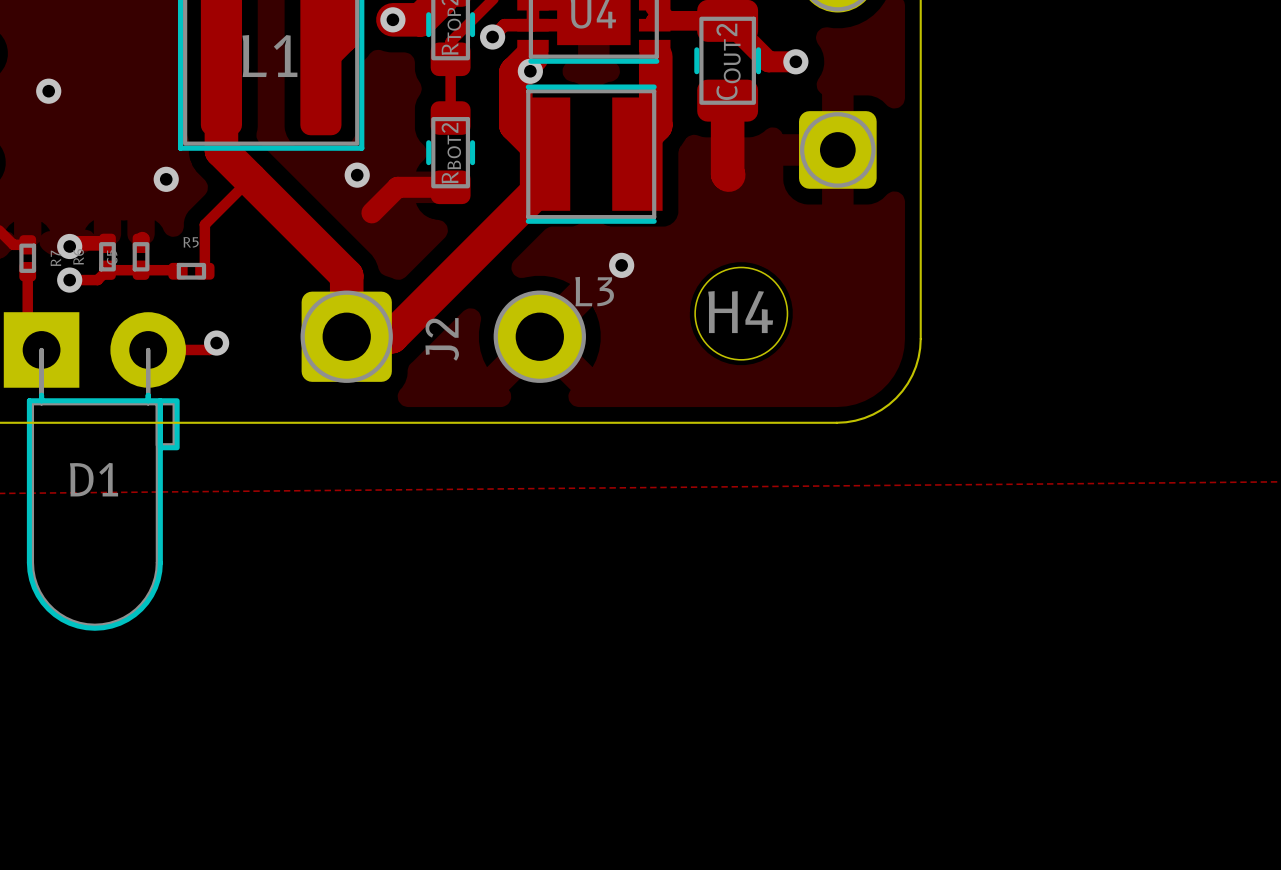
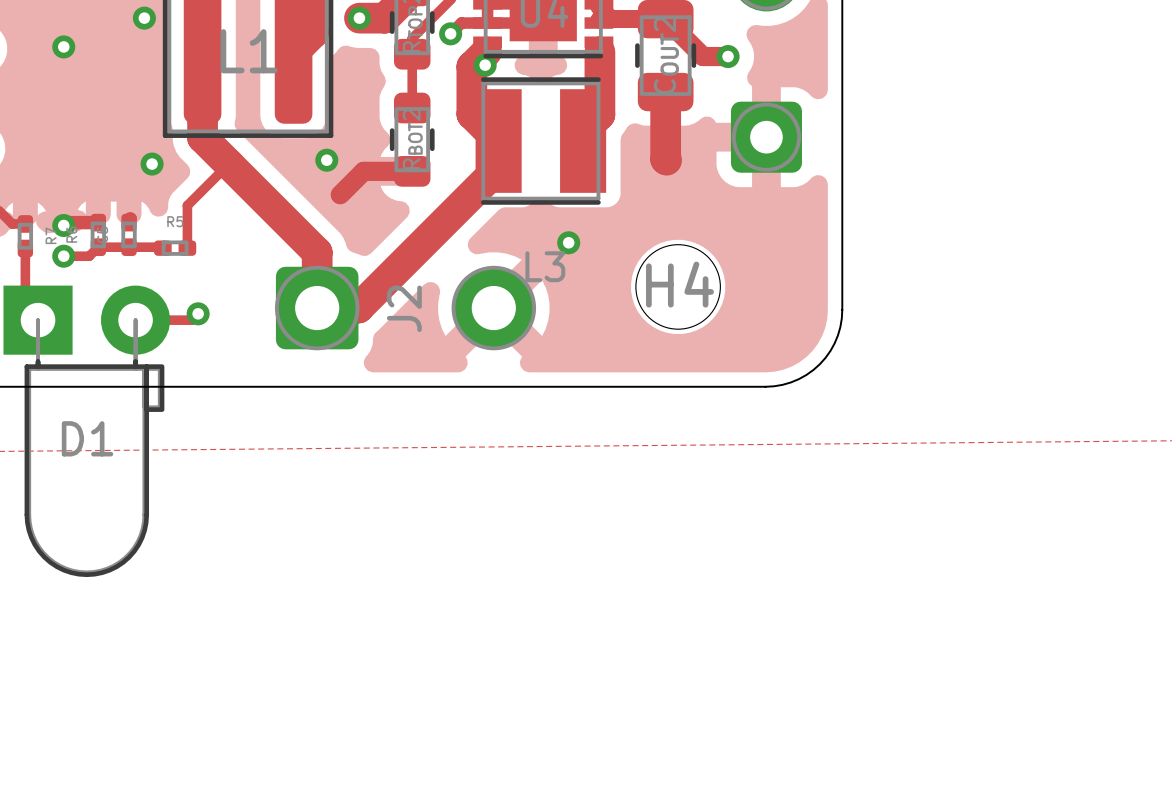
via: none -> (144, 18)
via position: (48, 91) -> (63, 46)

